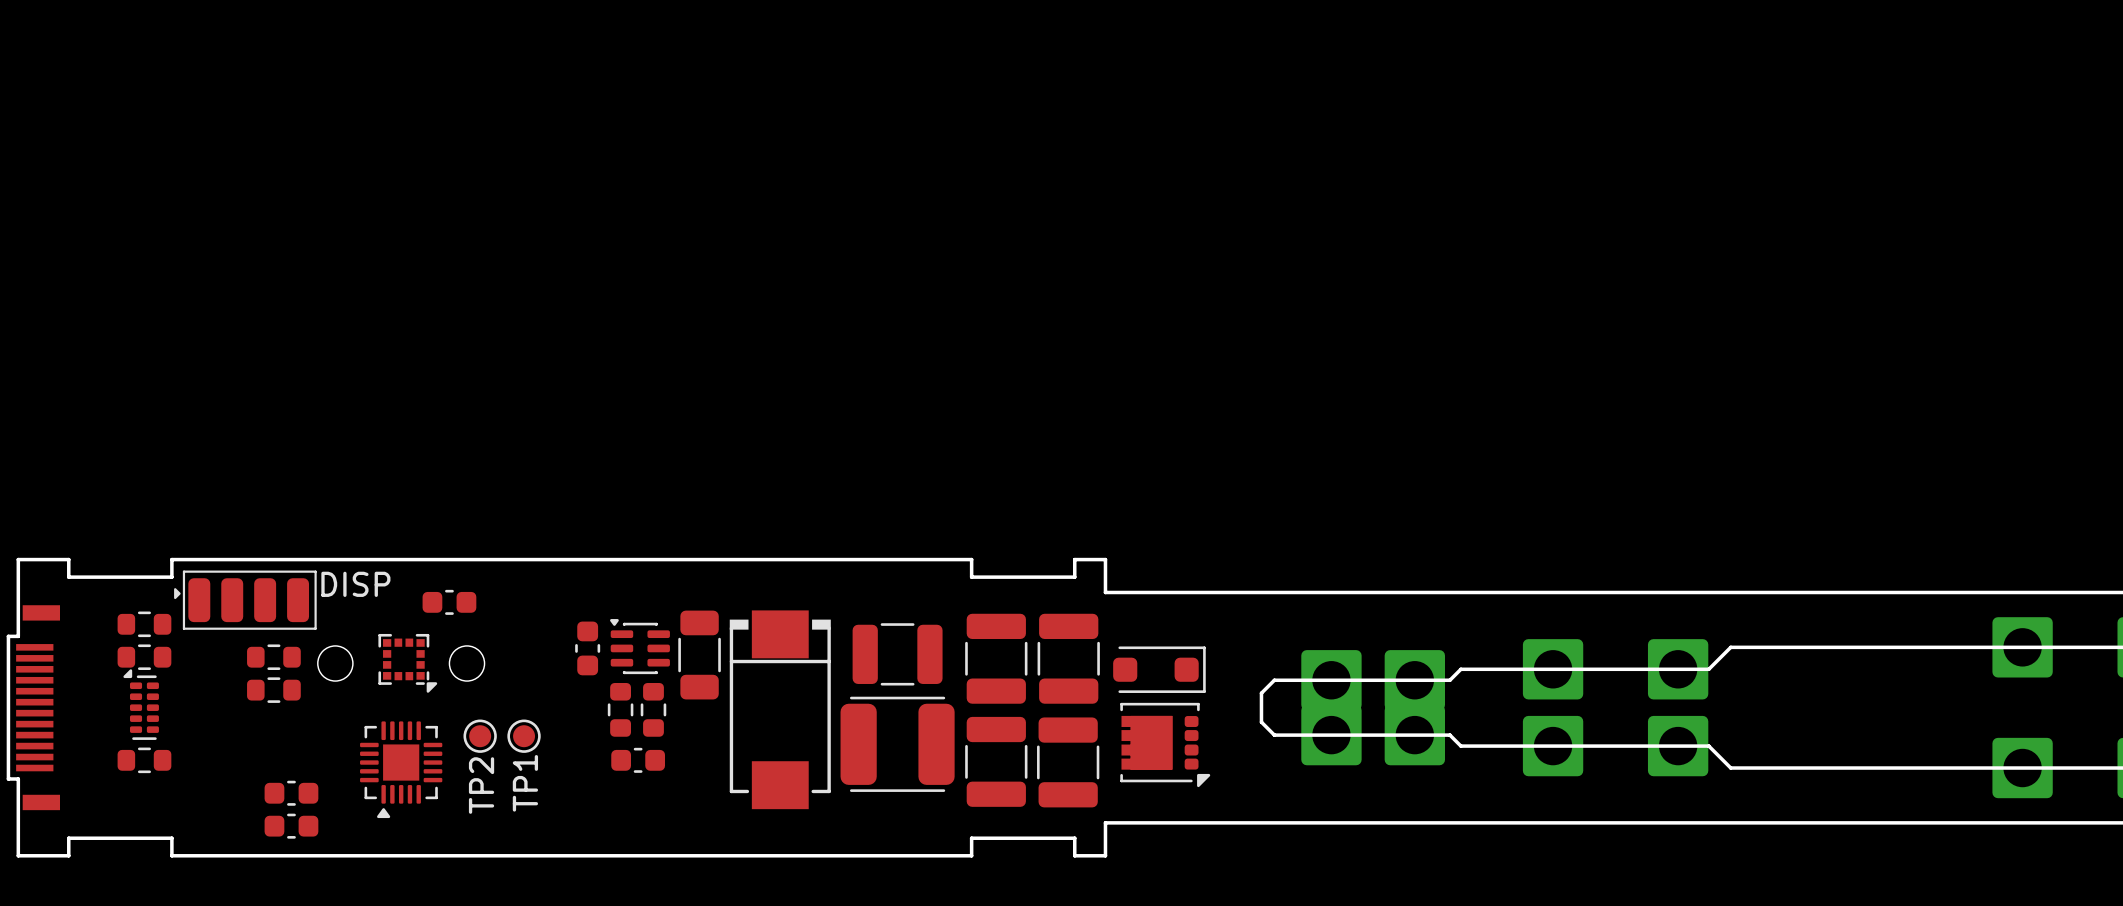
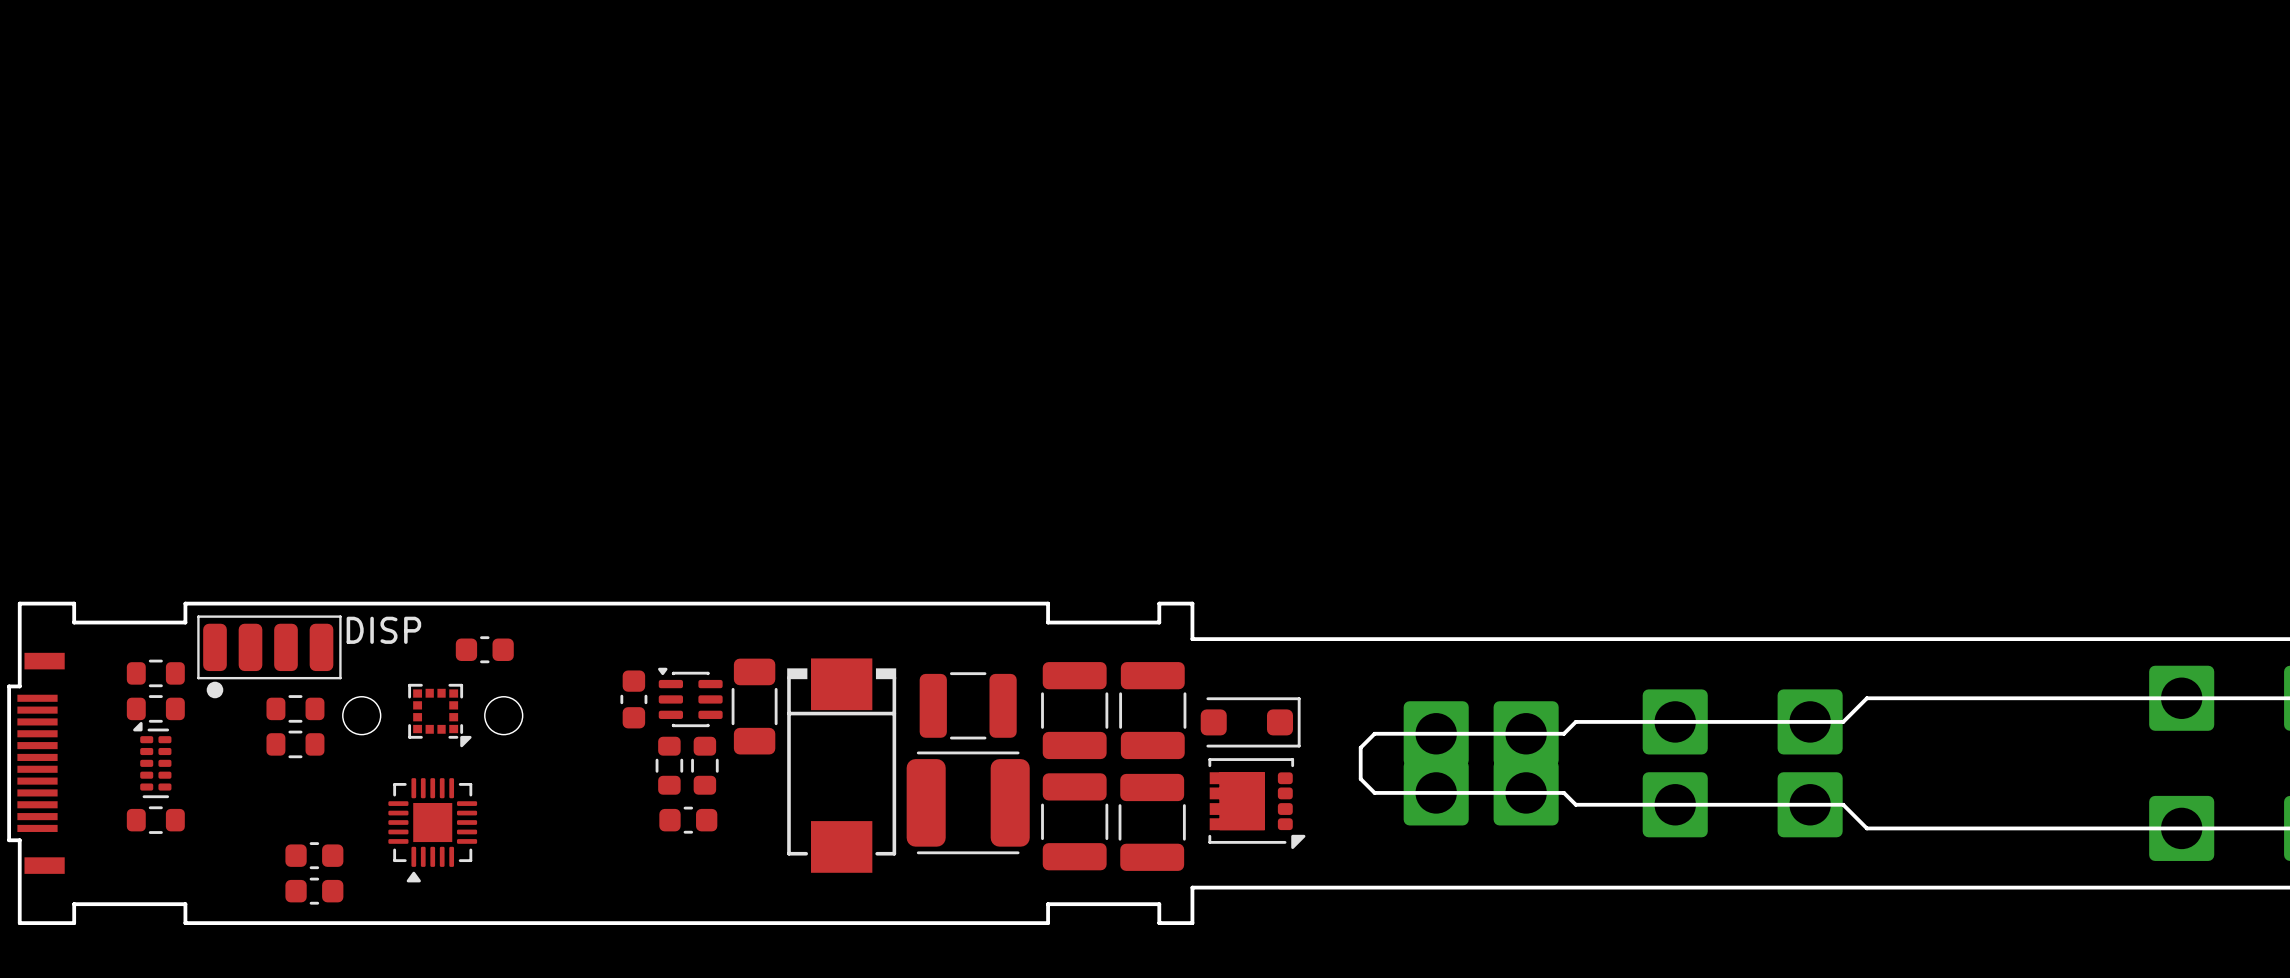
drawing: [174, 588, 181, 600] -> none
drawing: none -> [206, 681, 224, 699]
TP2: (480, 736) -> none
TP1: (524, 736) -> none

